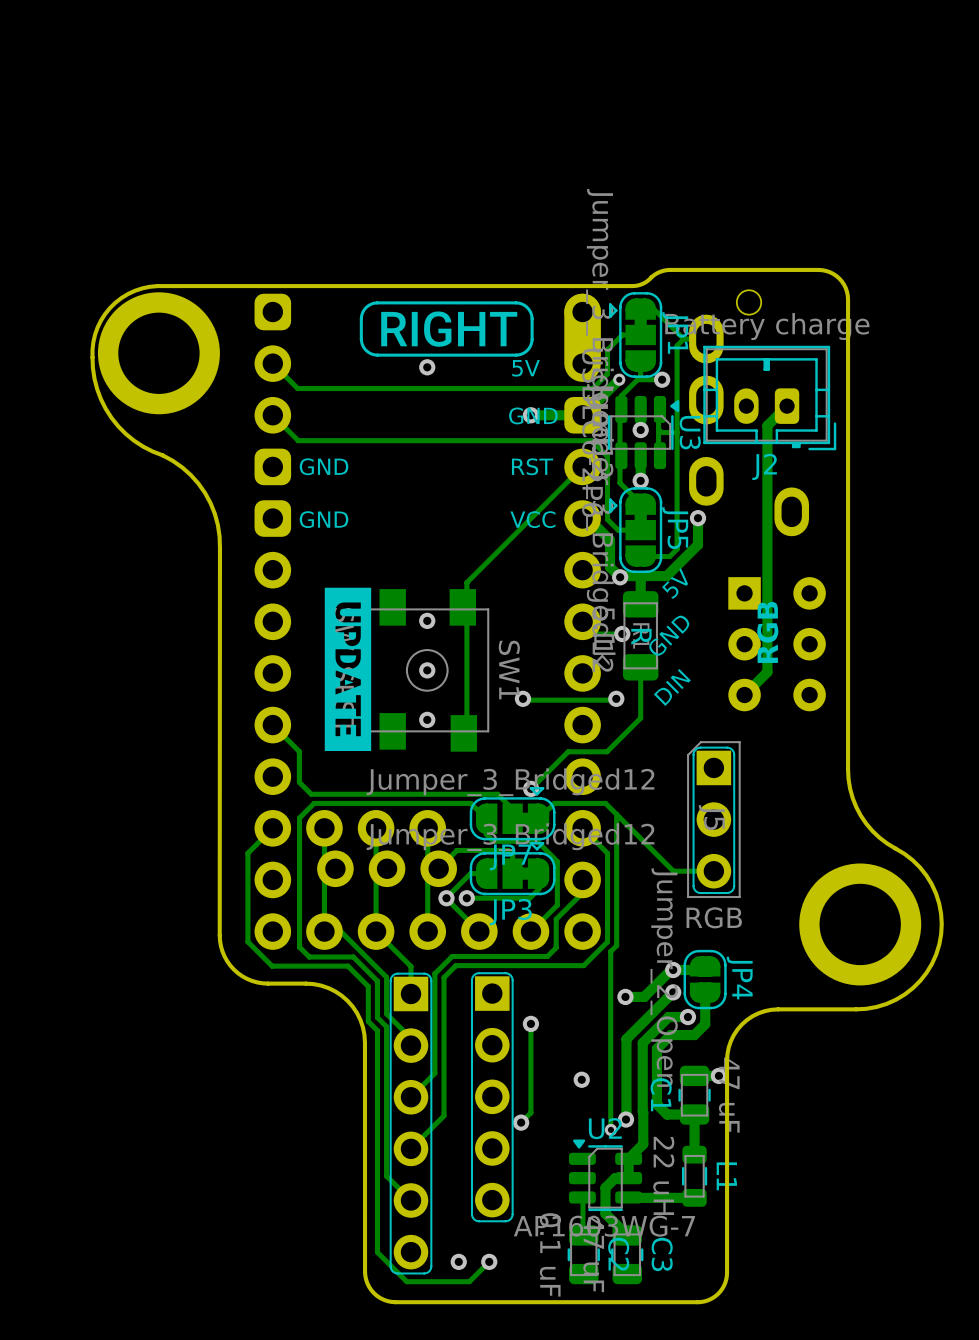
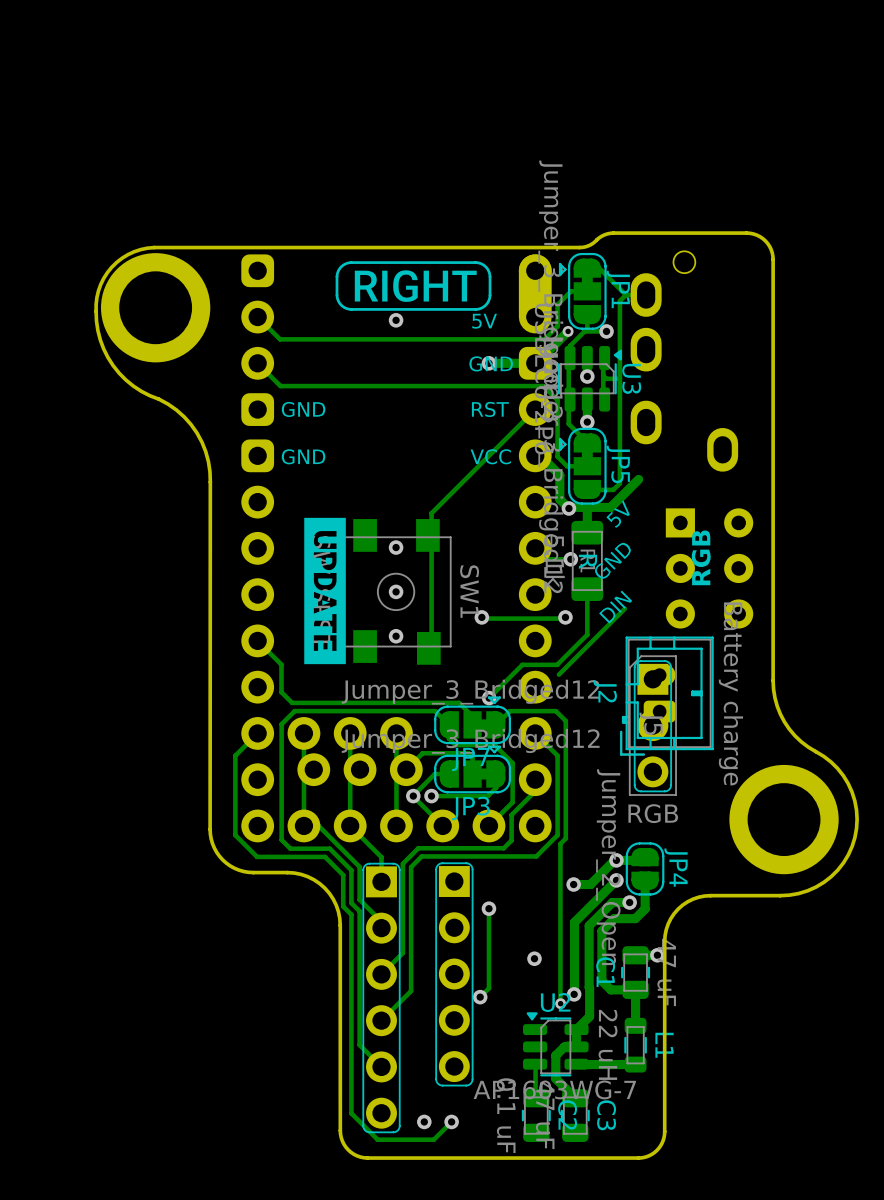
J2 rotation: 0° (769, 398) -> 90° clockwise (666, 696)
J2 position: (769, 398) -> (666, 696)
track: (787, 406) (767, 425) (767, 672) (744, 695) -> none
track: (698, 518) (698, 544) -> none
via: (698, 518) -> none
track: none -> (624, 608) (558, 674)
track: (616, 814) (673, 871) (713, 871) -> none

